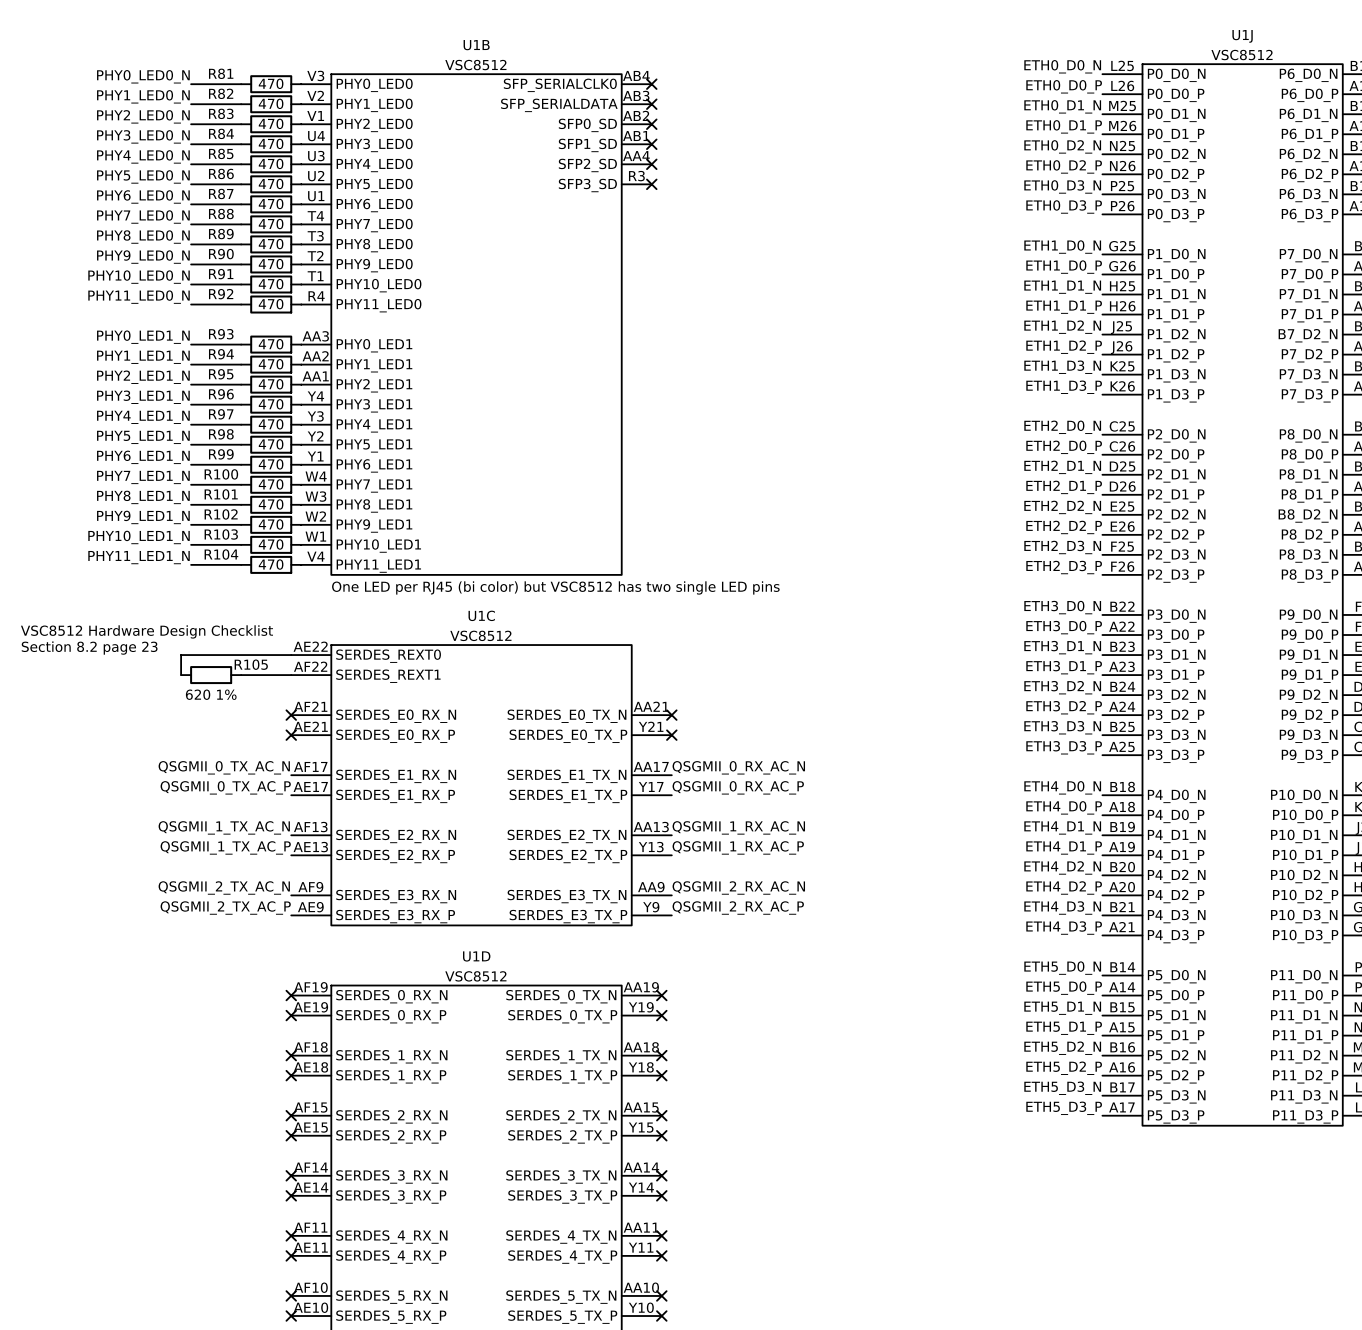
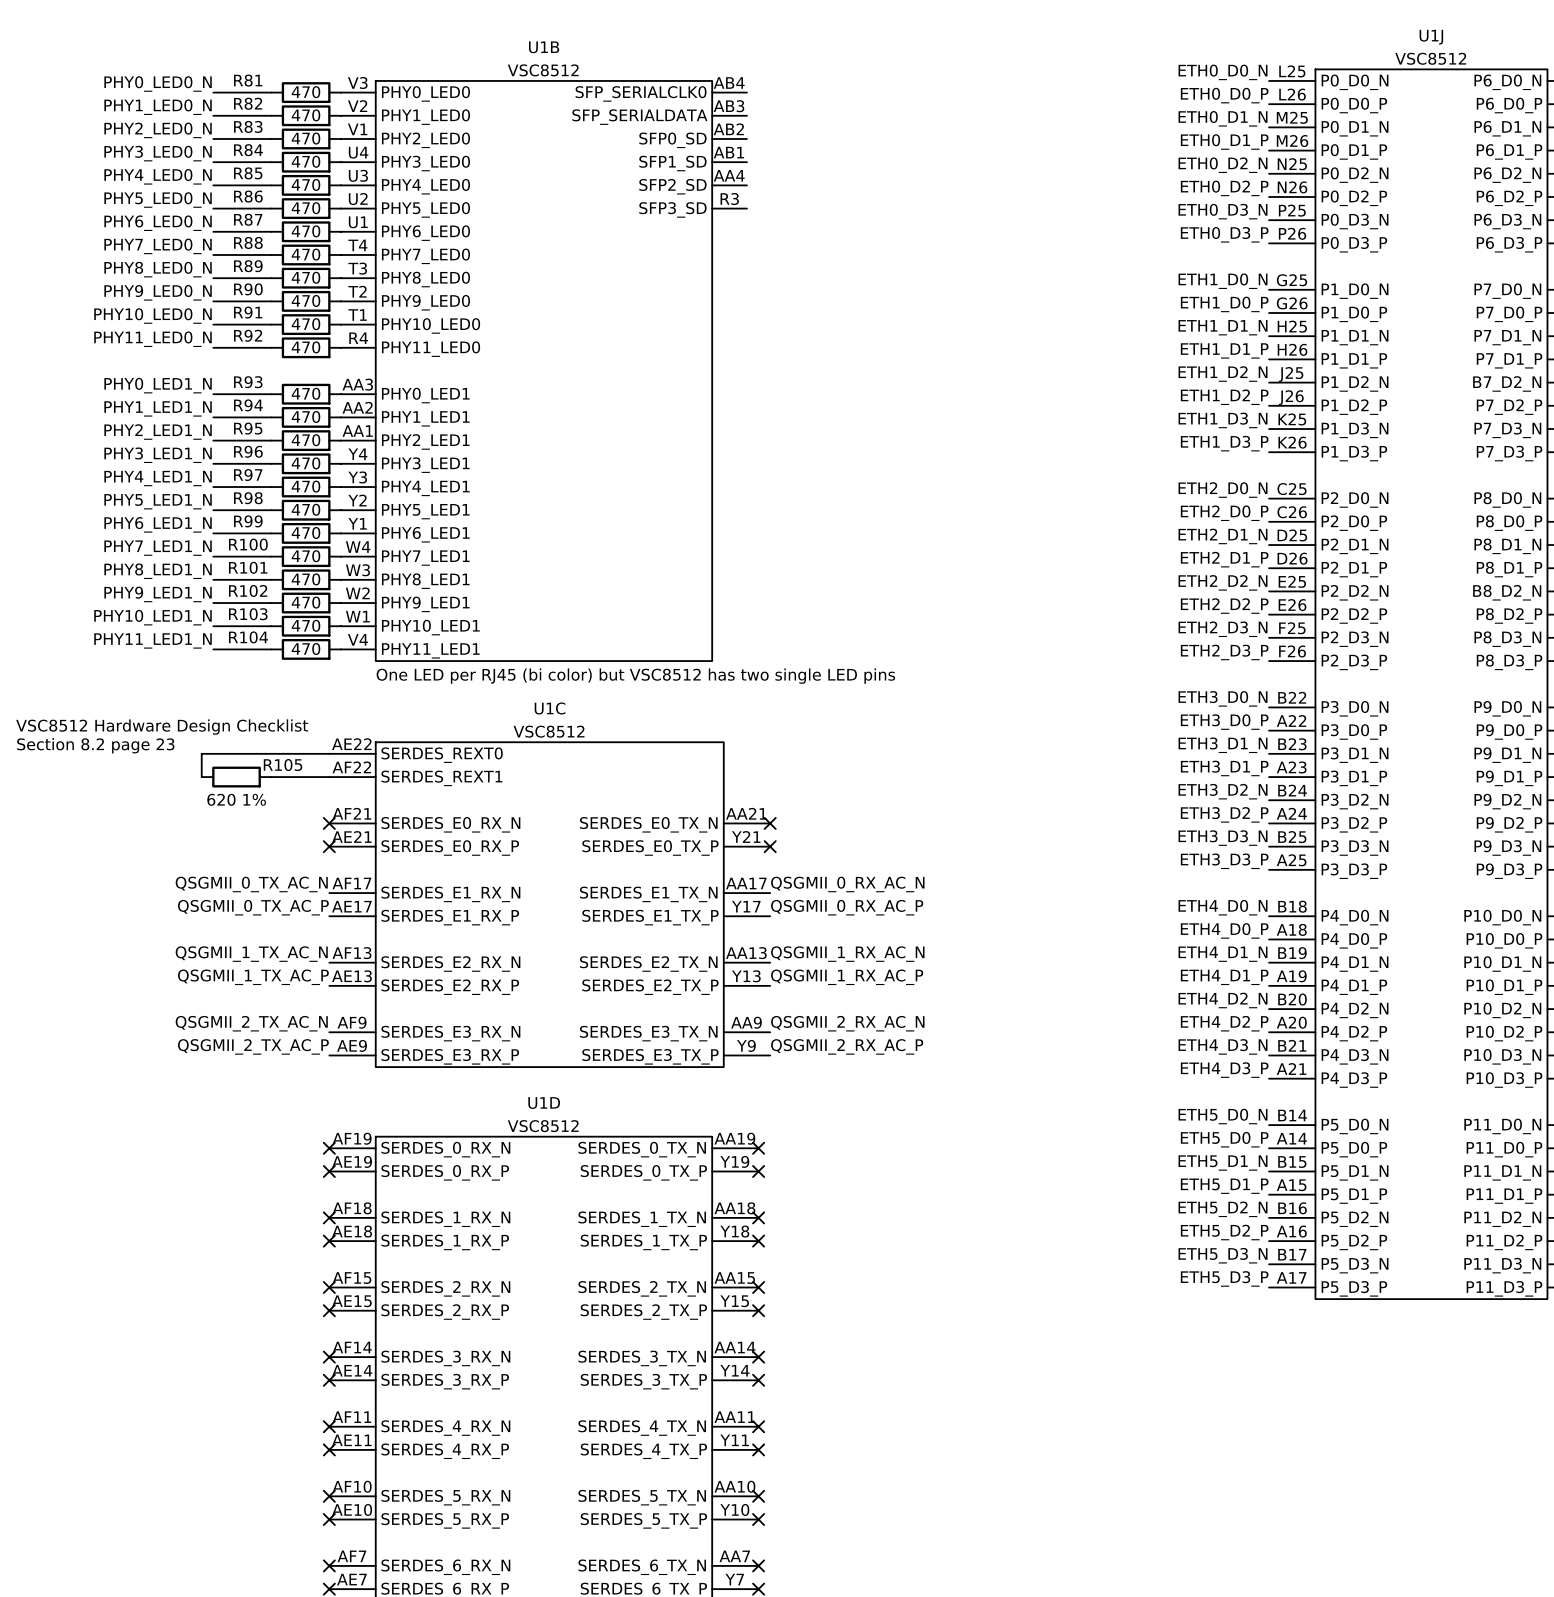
no-connect mark: (651, 84) -> none
no-connect mark: (651, 104) -> none
no-connect mark: (651, 124) -> none
no-connect mark: (651, 144) -> none
no-connect mark: (651, 164) -> none
no-connect mark: (651, 184) -> none

